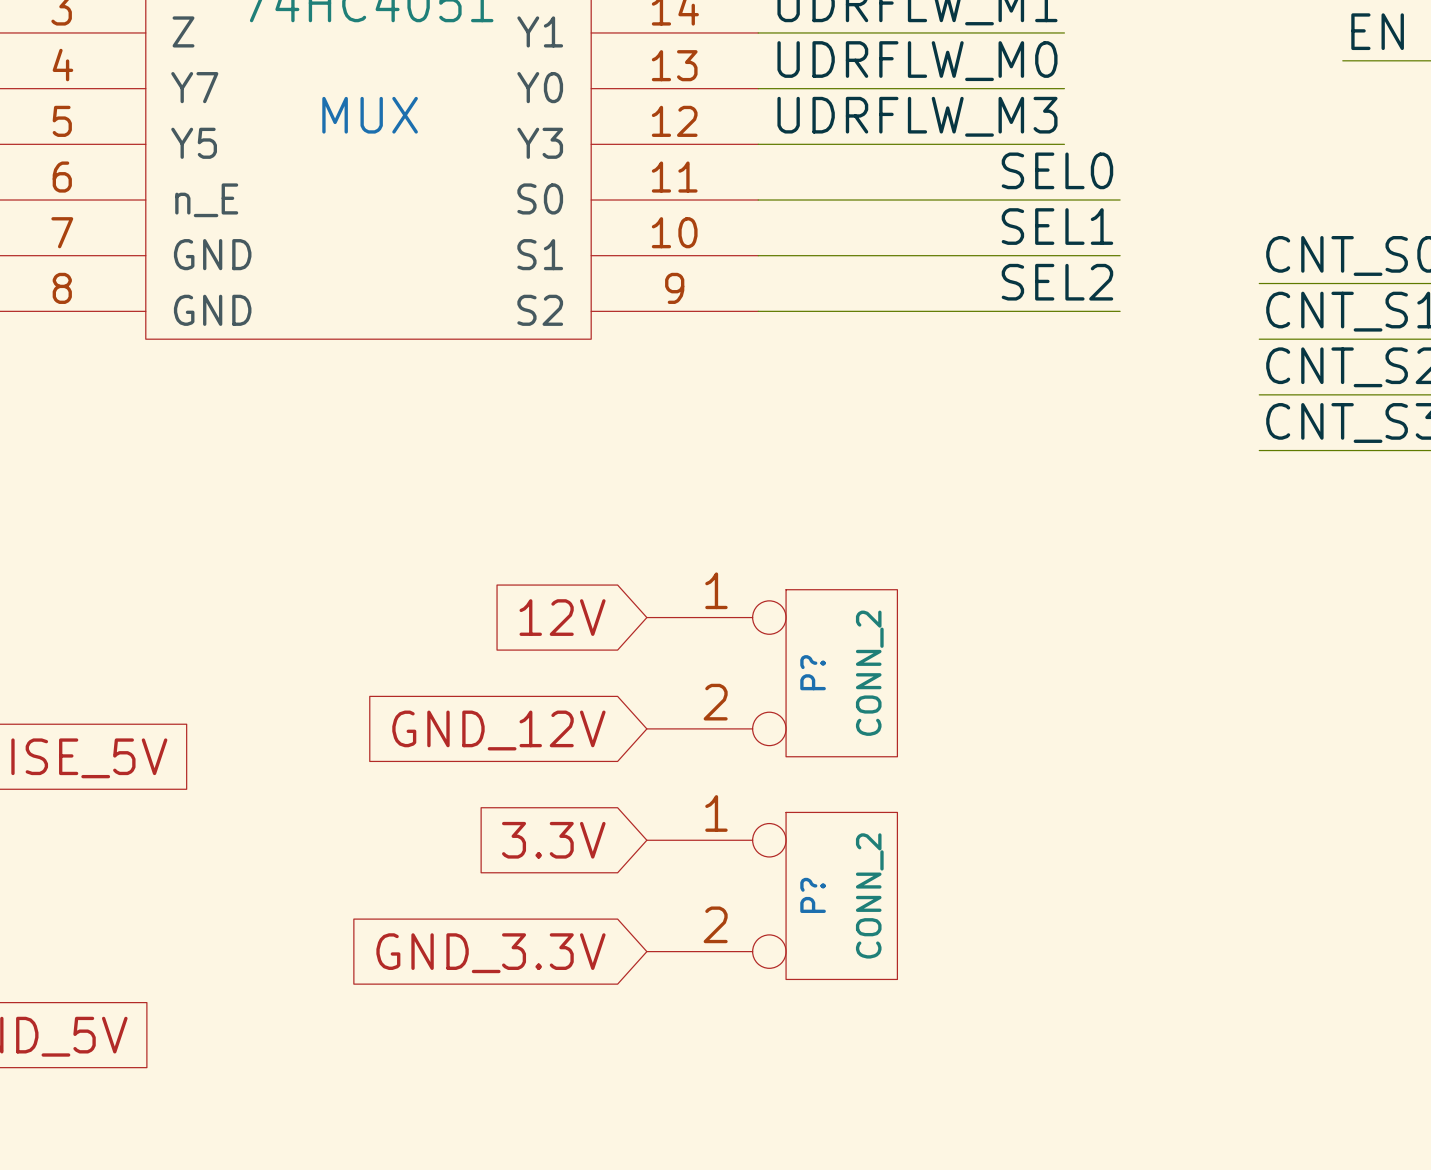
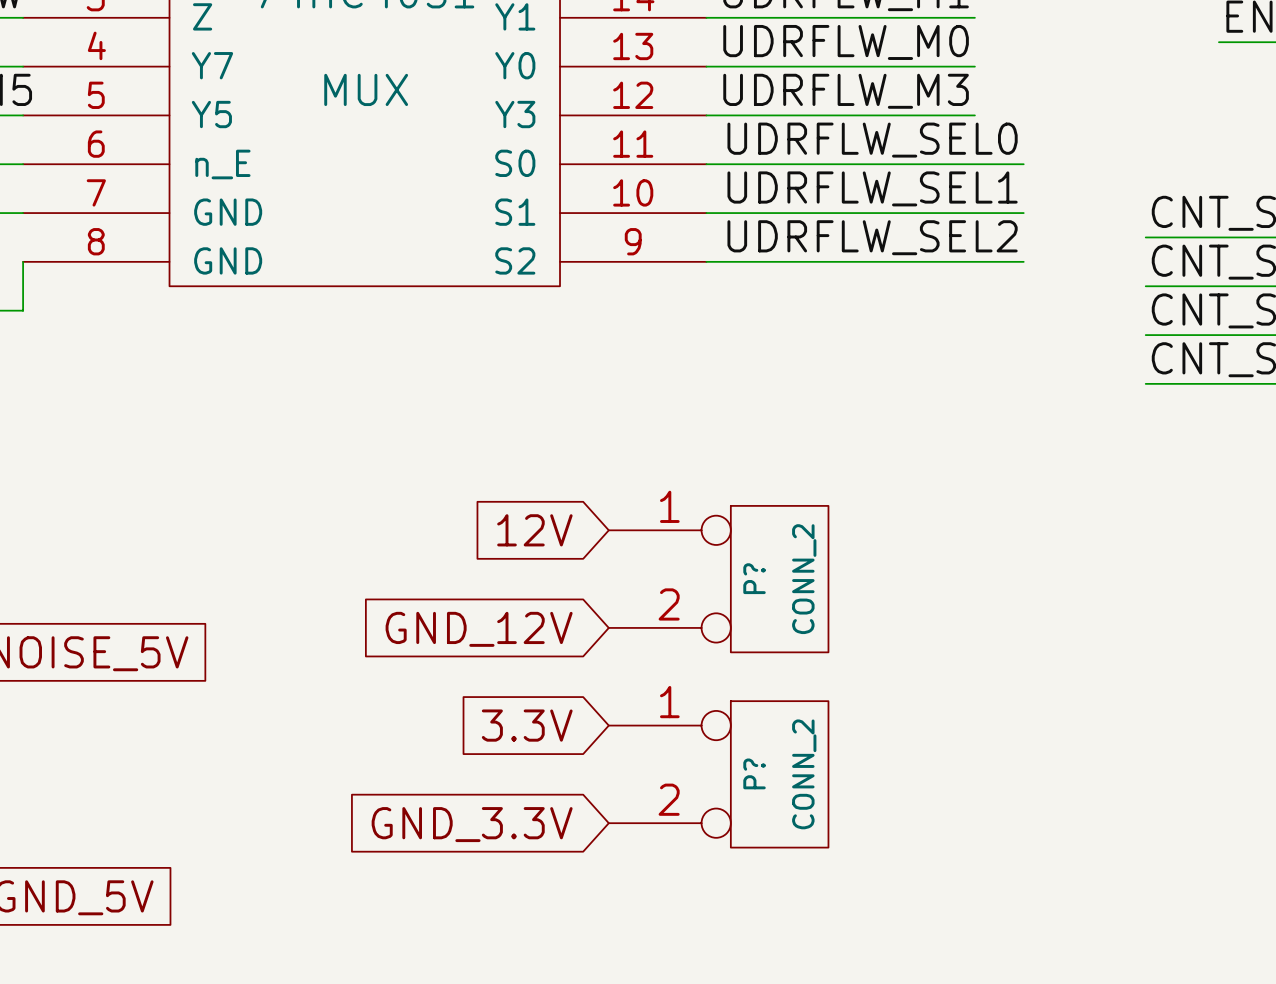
label: SEL0 (1057, 170) -> UDRFLW_SEL0 (872, 140)
label: SEL1 (1057, 226) -> UDRFLW_SEL1 (872, 188)
label: SEL2 (1057, 282) -> UDRFLW_SEL2 (872, 237)

